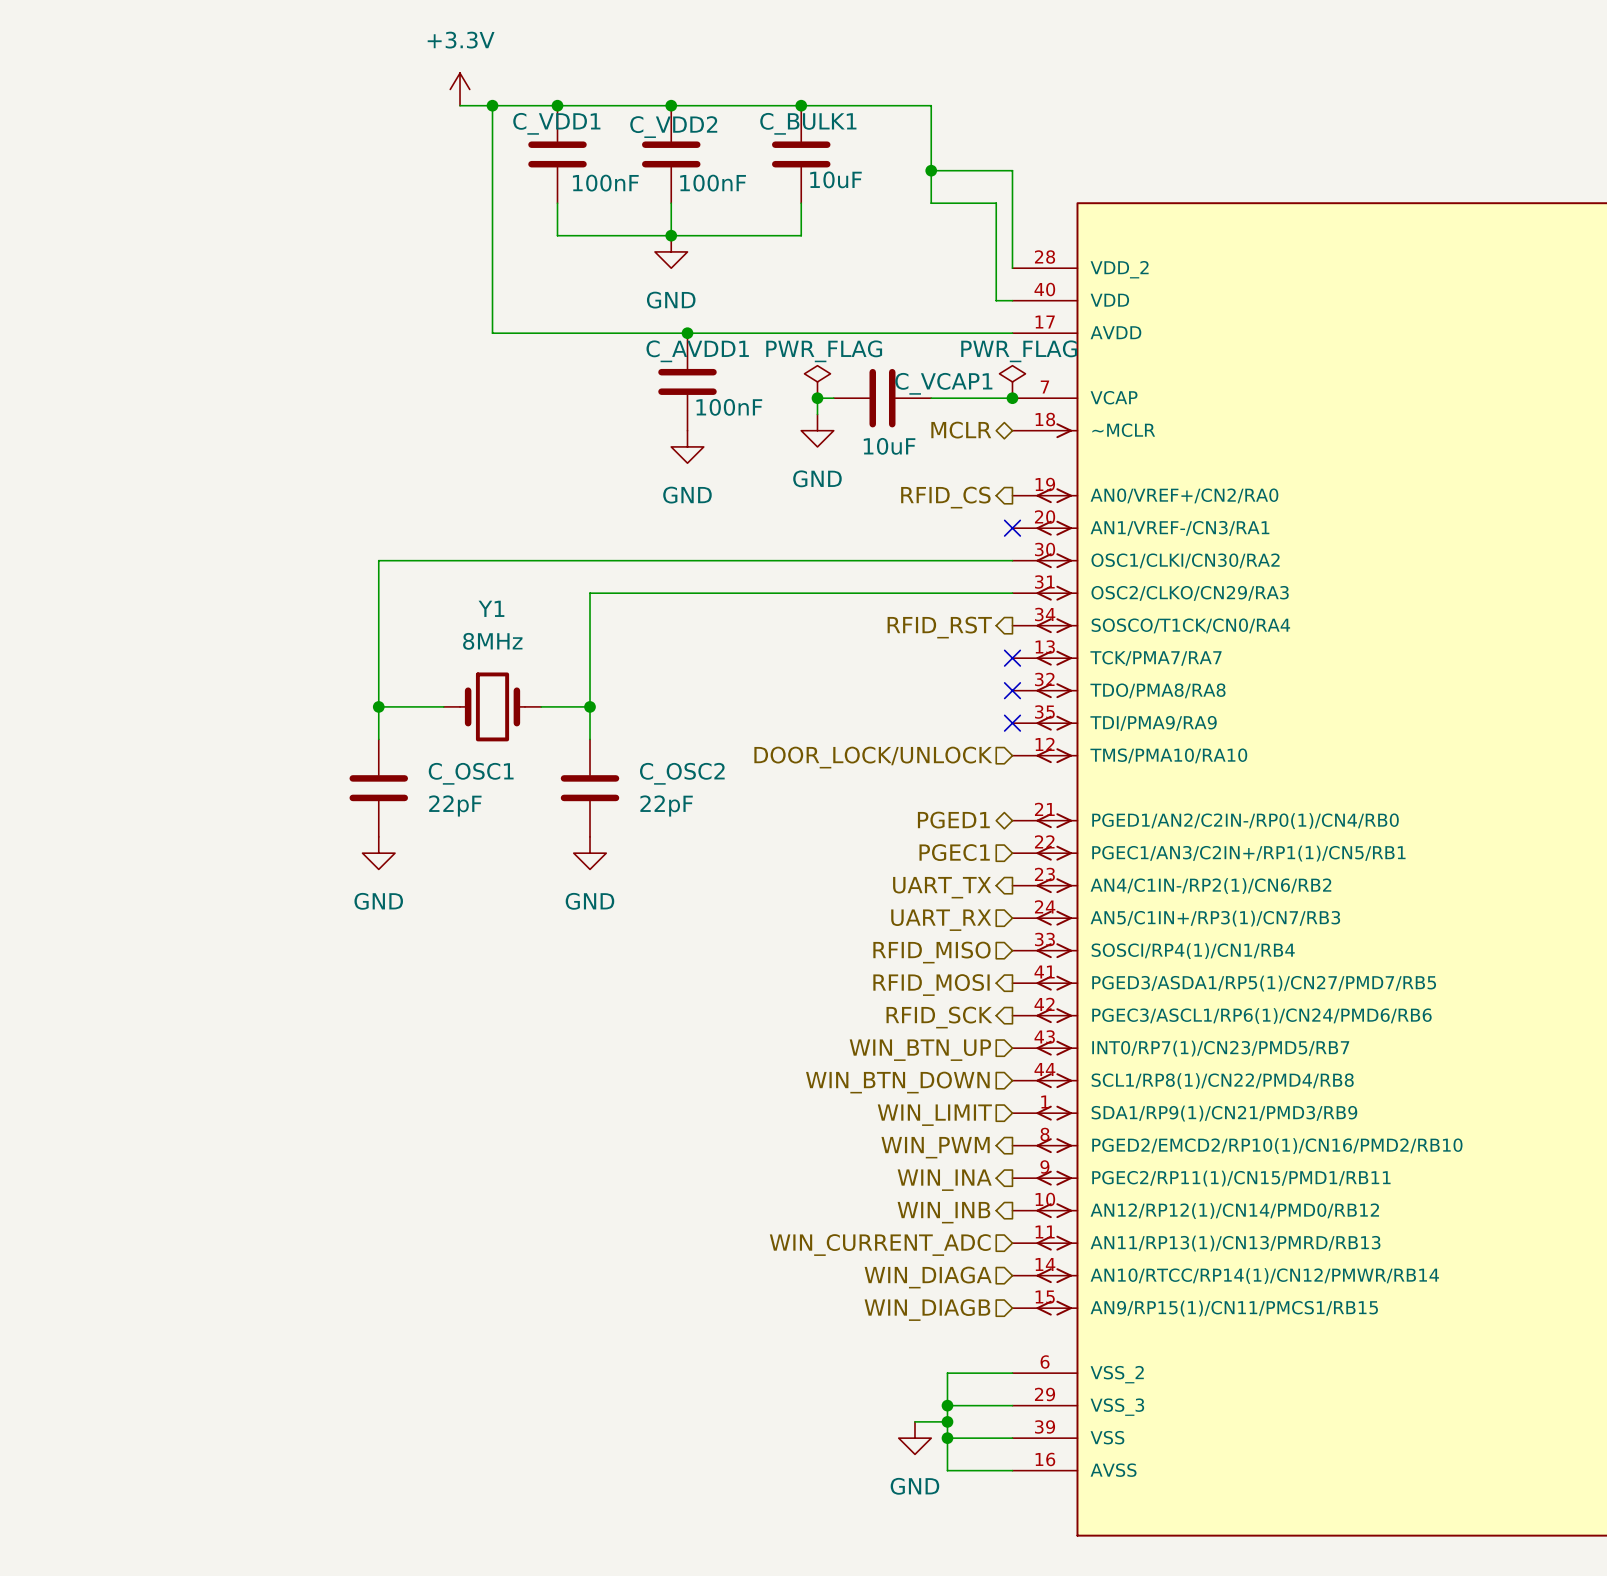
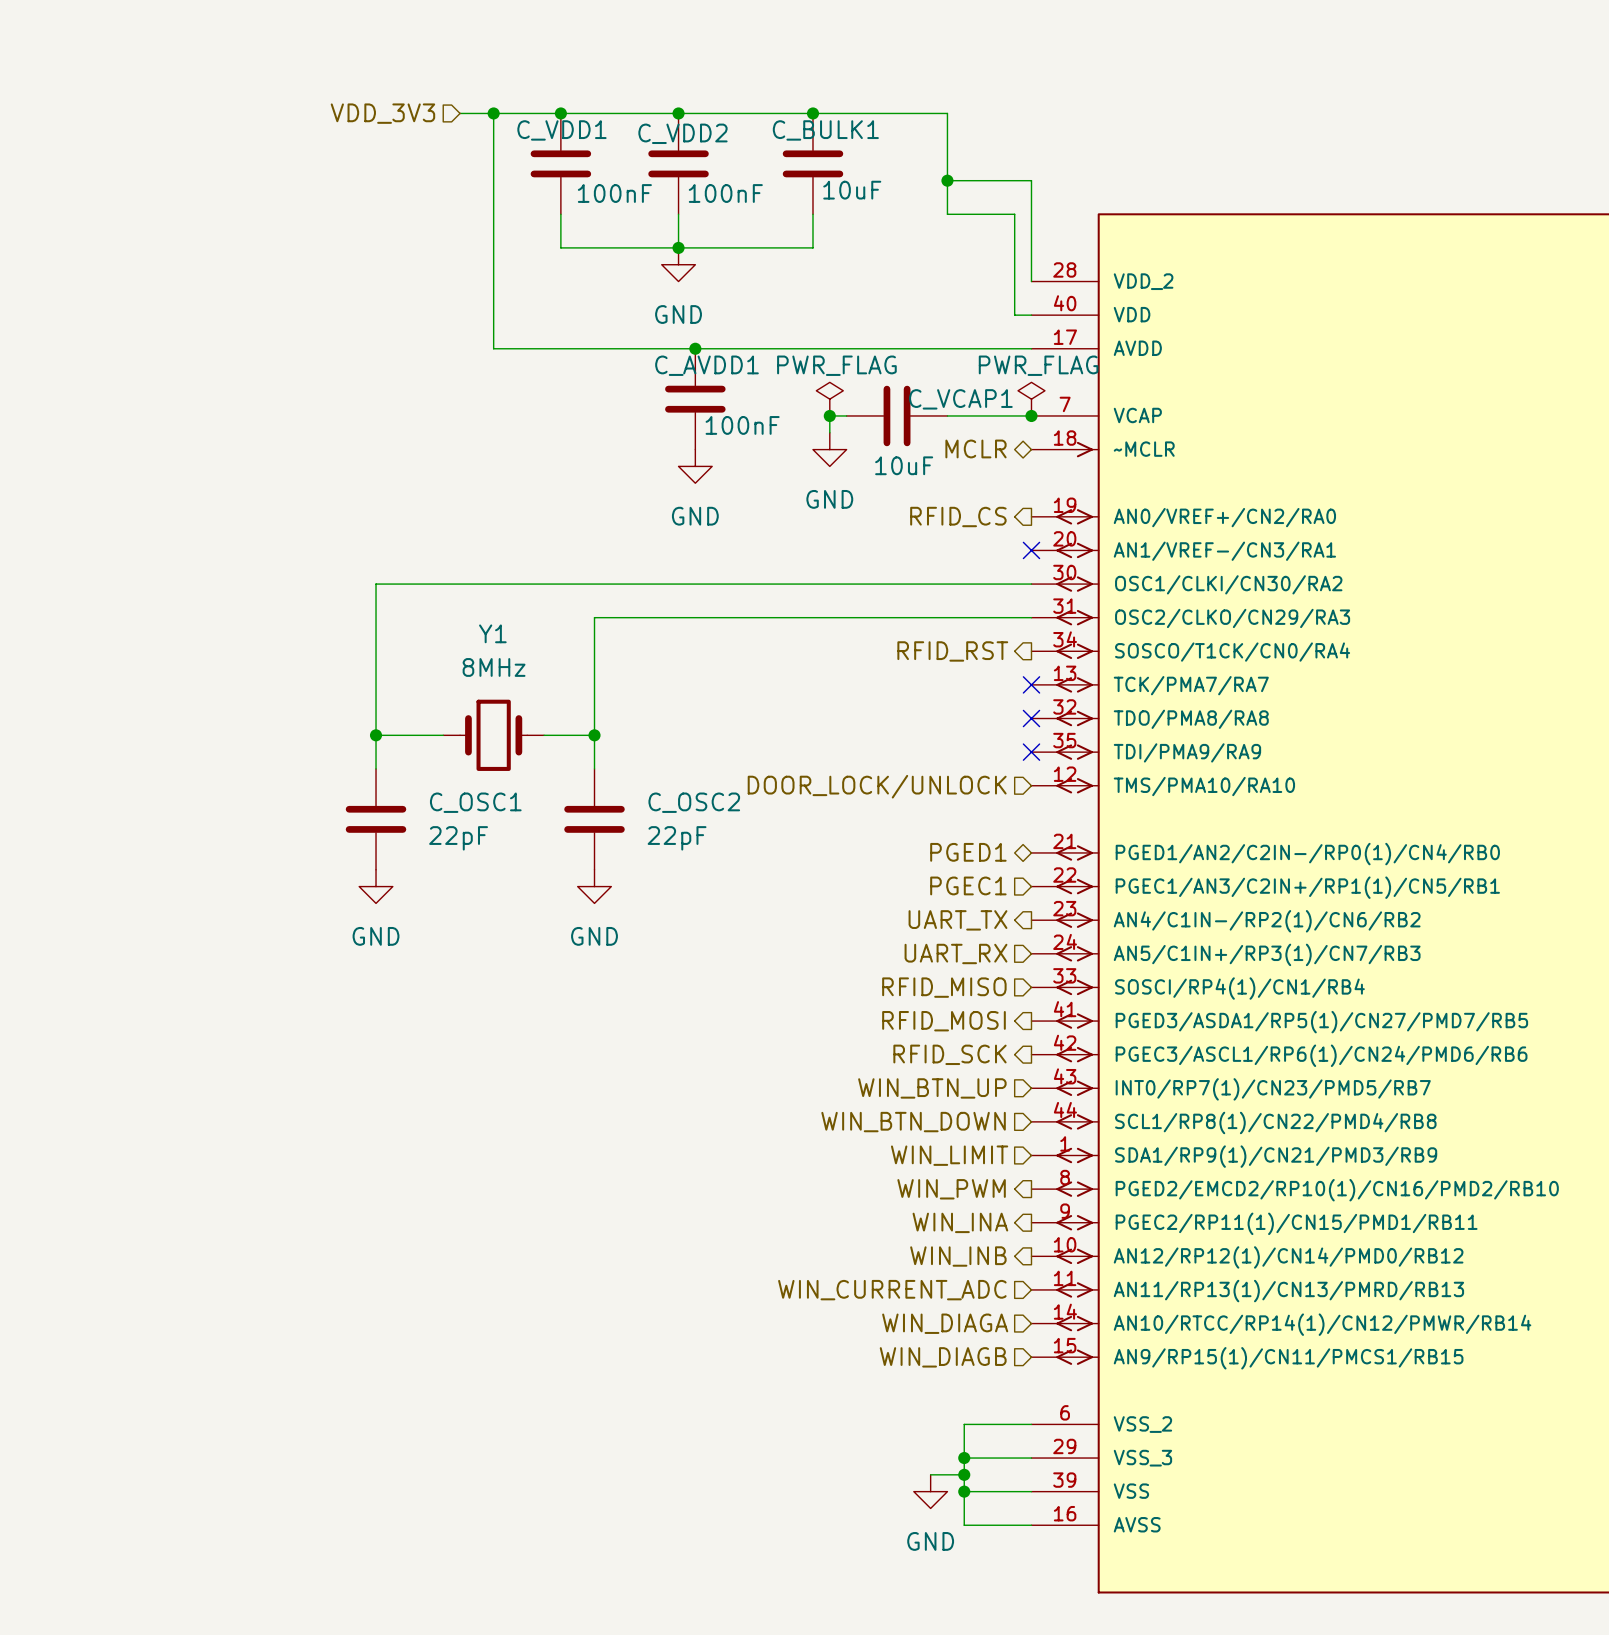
power symbol: +3.3V (460, 89) -> none
hierarchical label: none -> VDD_3V3 (382, 113)

